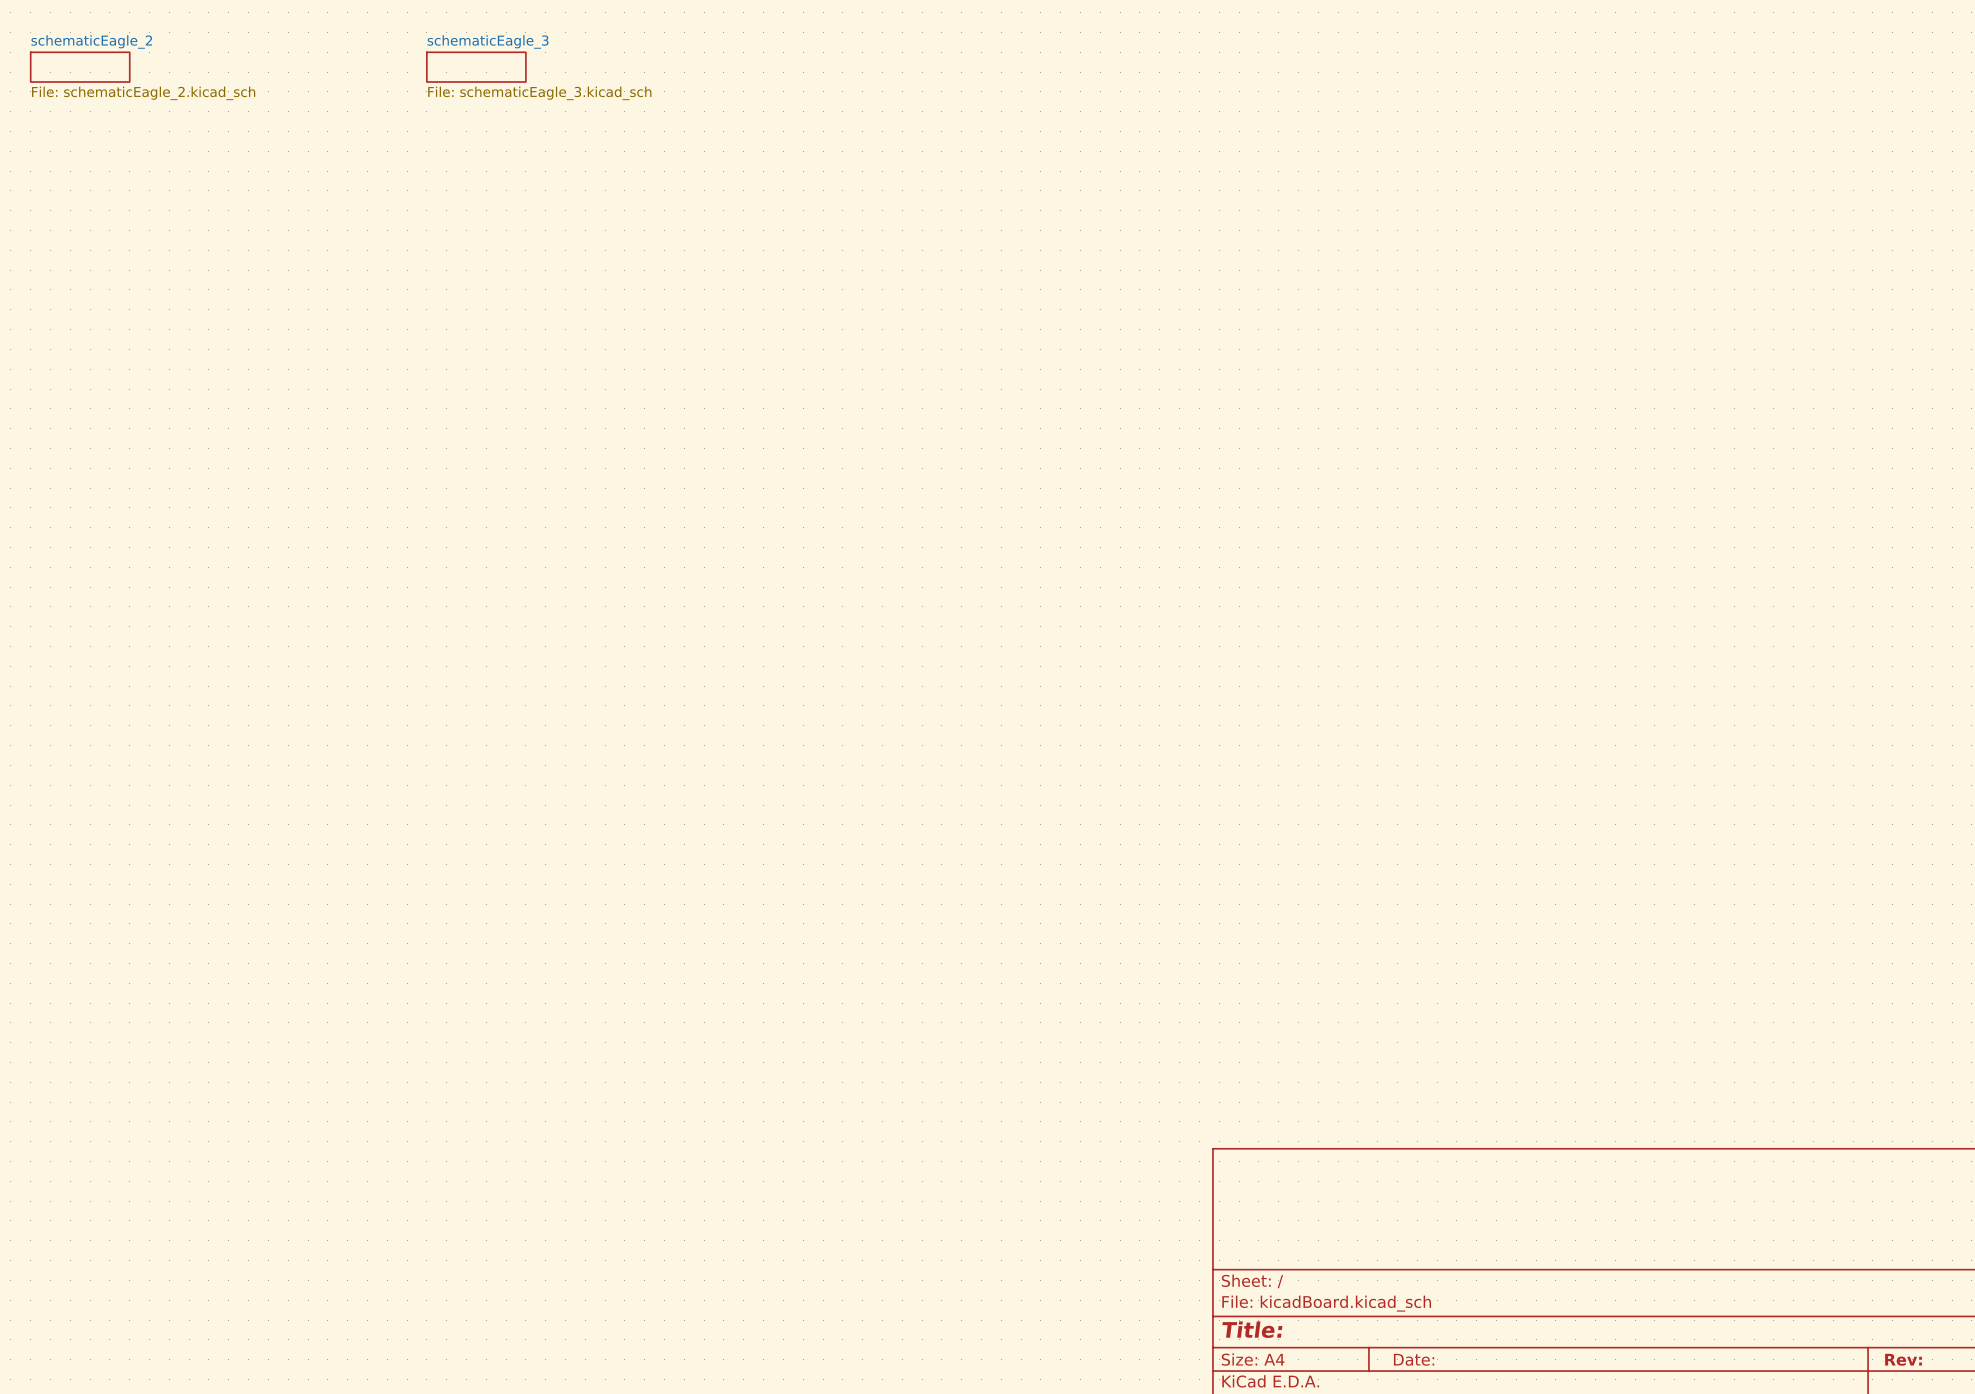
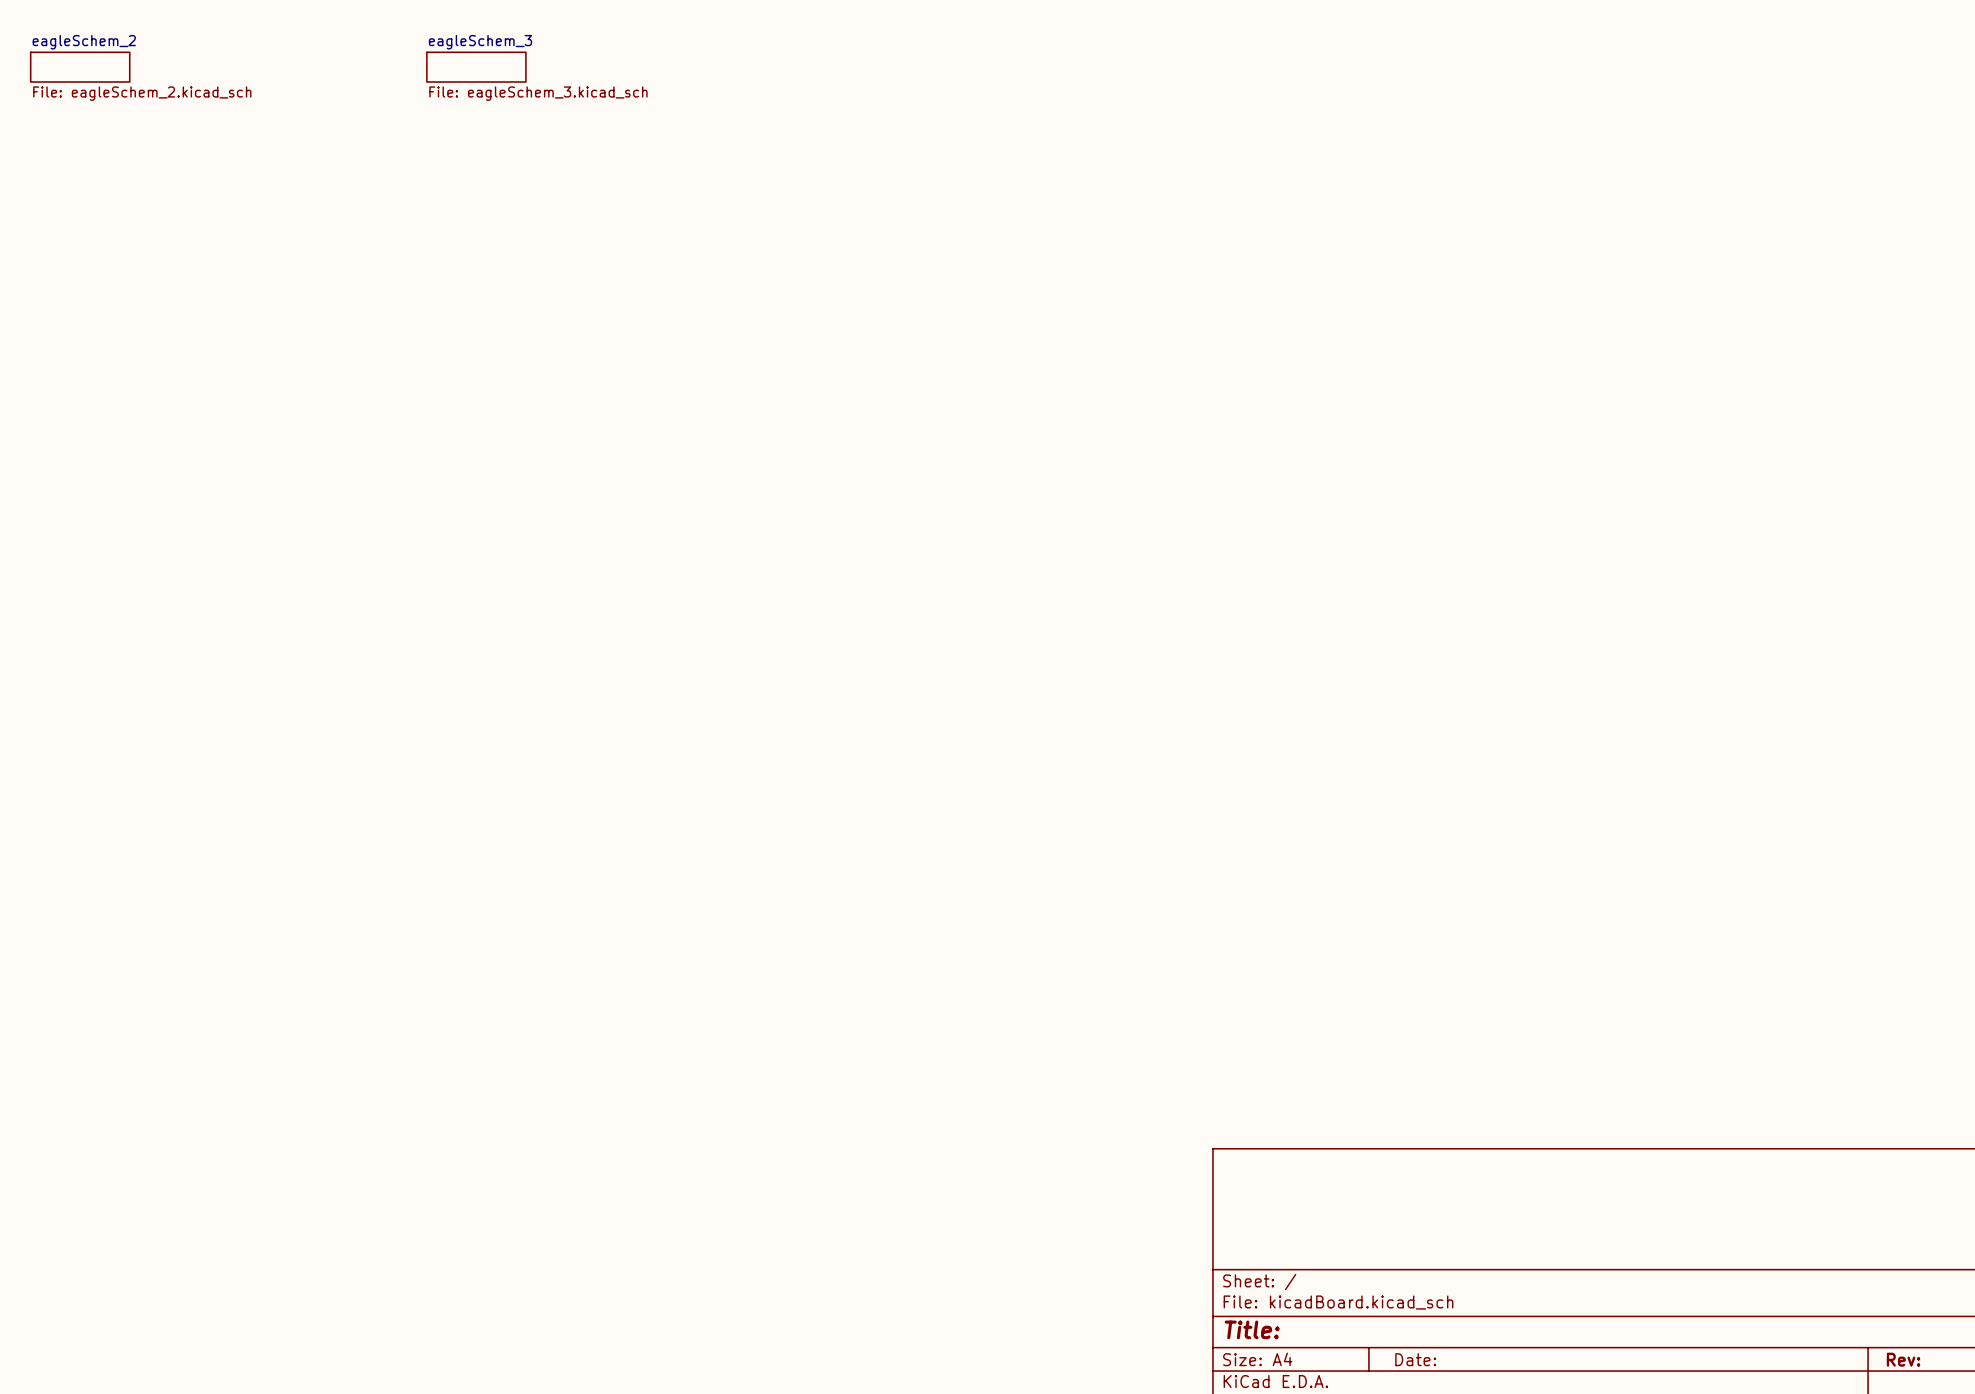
sheet schematicEagle_2 name: schematicEagle_2 (91, 41) -> eagleSchem_2 (84, 42)
sheet schematicEagle_3 name: schematicEagle_3 (488, 41) -> eagleSchem_3 (480, 42)
sheet schematicEagle_2 value: File: schematicEagle_2.kicad_sch (143, 93) -> File: eagleSchem_2.kicad_sch (142, 93)
sheet schematicEagle_3 value: File: schematicEagle_3.kicad_sch (539, 93) -> File: eagleSchem_3.kicad_sch (538, 93)

